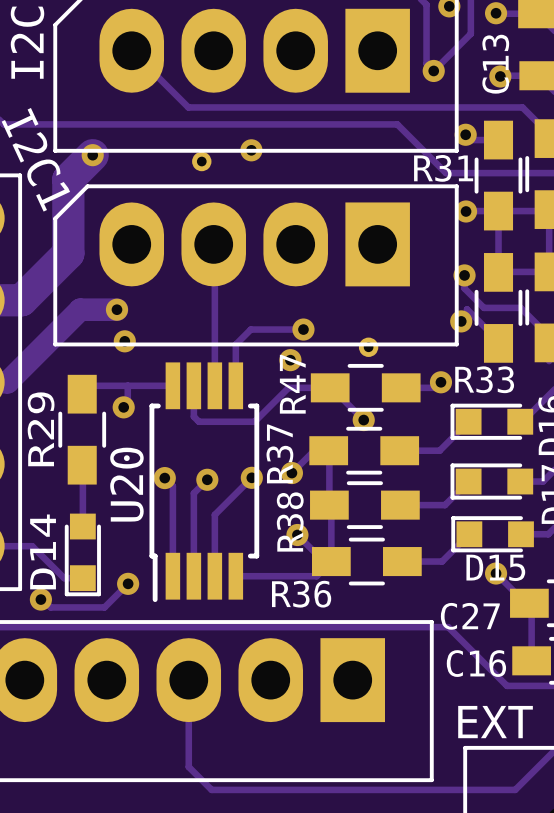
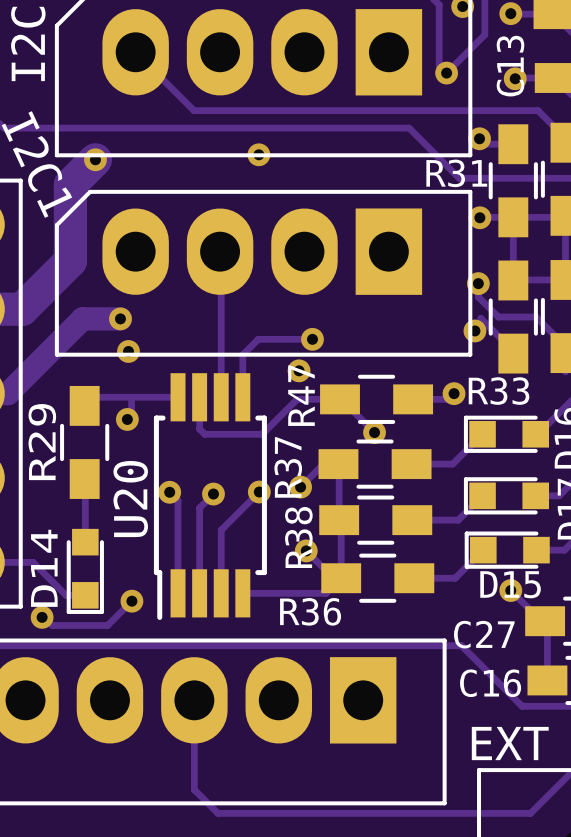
part: (201, 161) -> none
part: (368, 347) -> none

